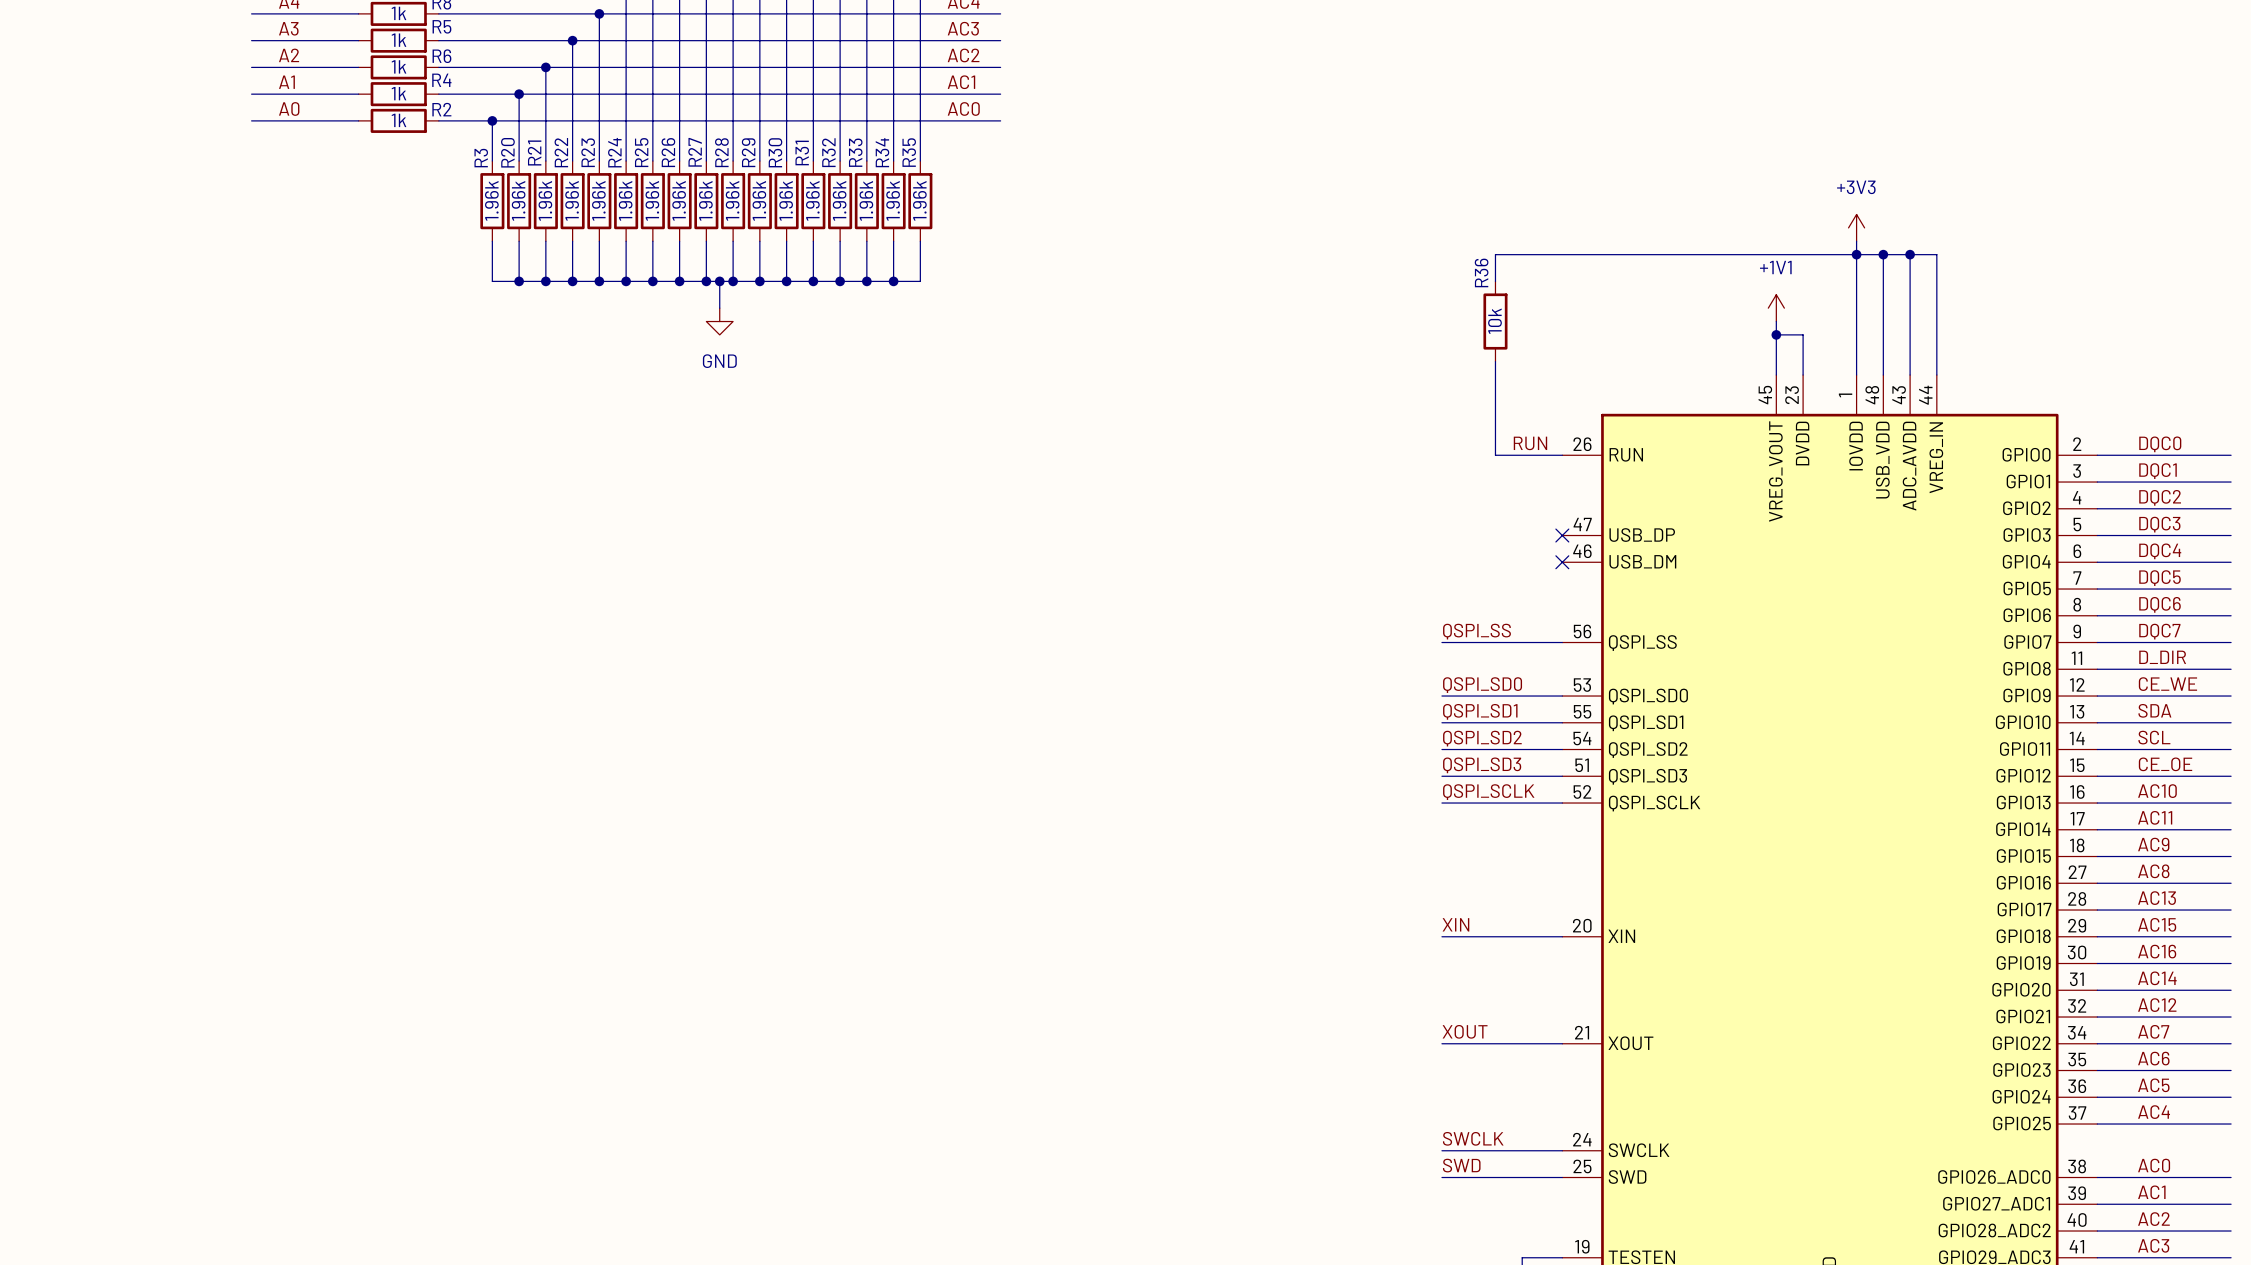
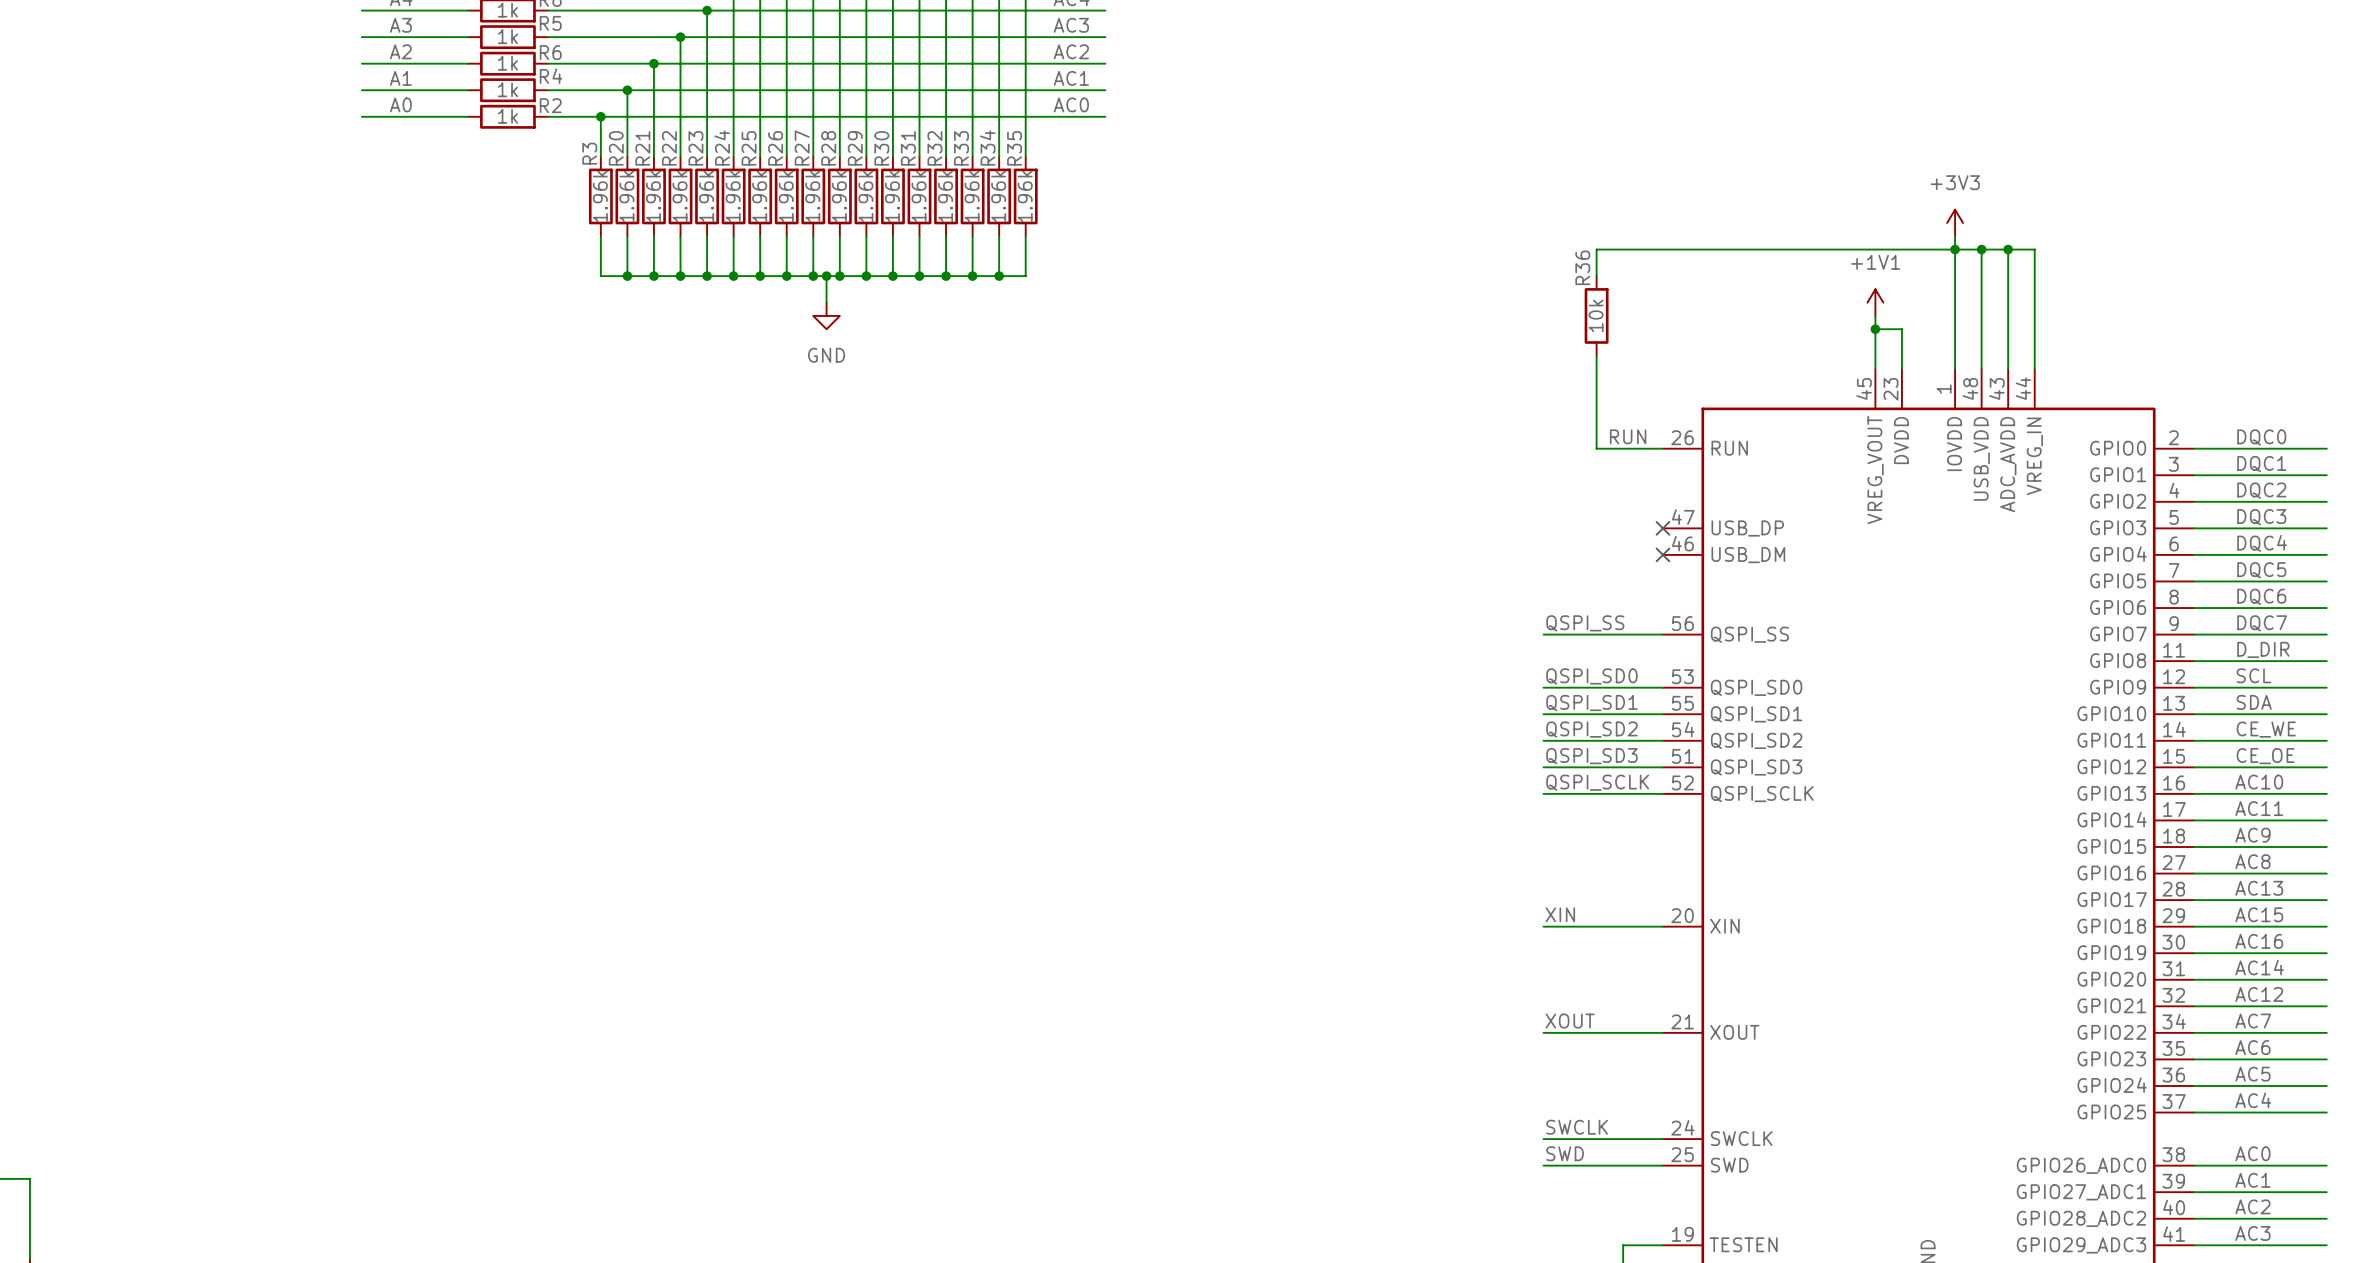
label: CE_WE (2167, 684) -> SCL (2253, 675)
label: SCL (2154, 737) -> CE_WE (2266, 729)

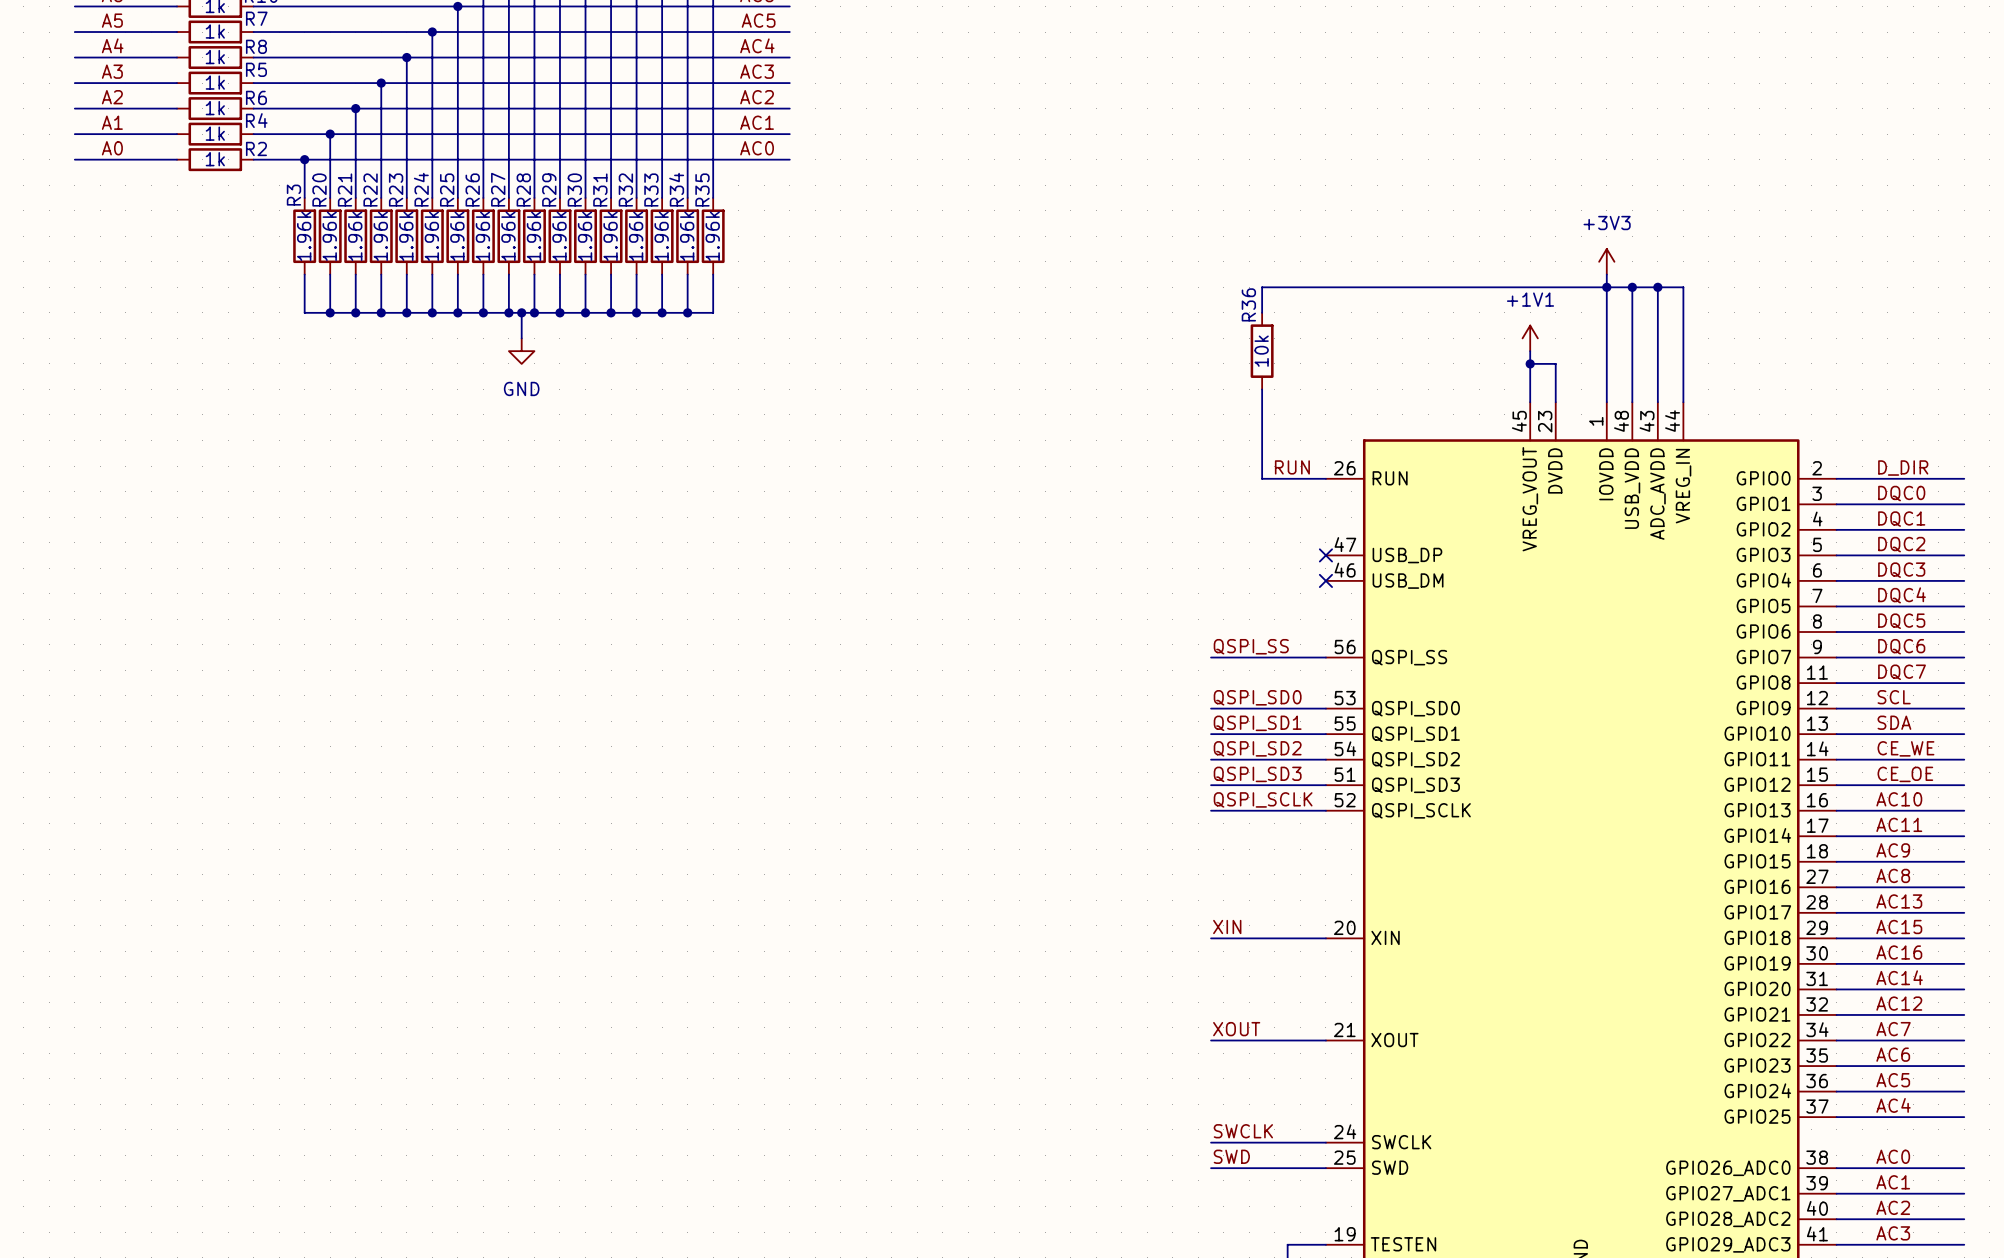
label: DQC0 (2261, 437) -> D_DIR (1903, 468)
label: DQC1 (2261, 464) -> DQC0 (1901, 493)
label: DQC2 (2261, 490) -> DQC1 (1901, 519)
label: DQC3 (2261, 517) -> DQC2 (1901, 544)
label: DQC4 (2262, 543) -> DQC3 (1901, 570)
label: DQC5 (2261, 570) -> DQC4 (1902, 595)
label: DQC6 (2261, 596) -> DQC5 (1901, 621)
label: DQC7 (2262, 623) -> DQC6 (1901, 646)
label: D_DIR (2263, 649) -> DQC7 (1902, 672)

